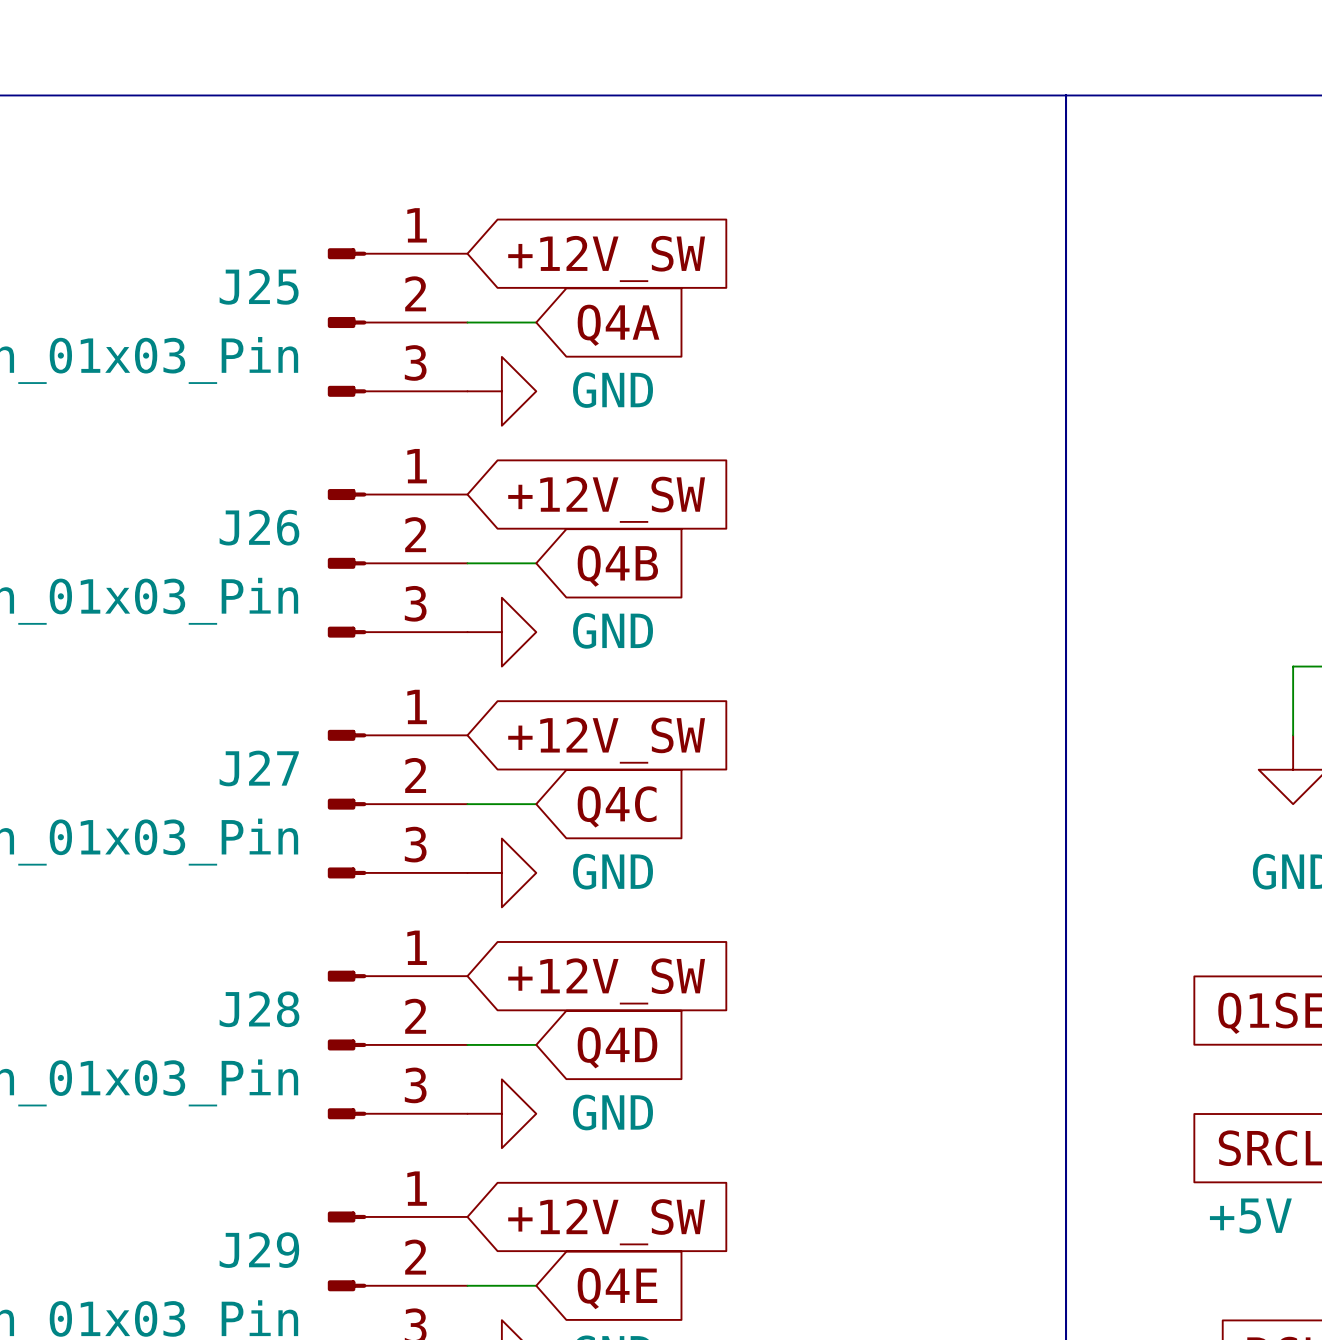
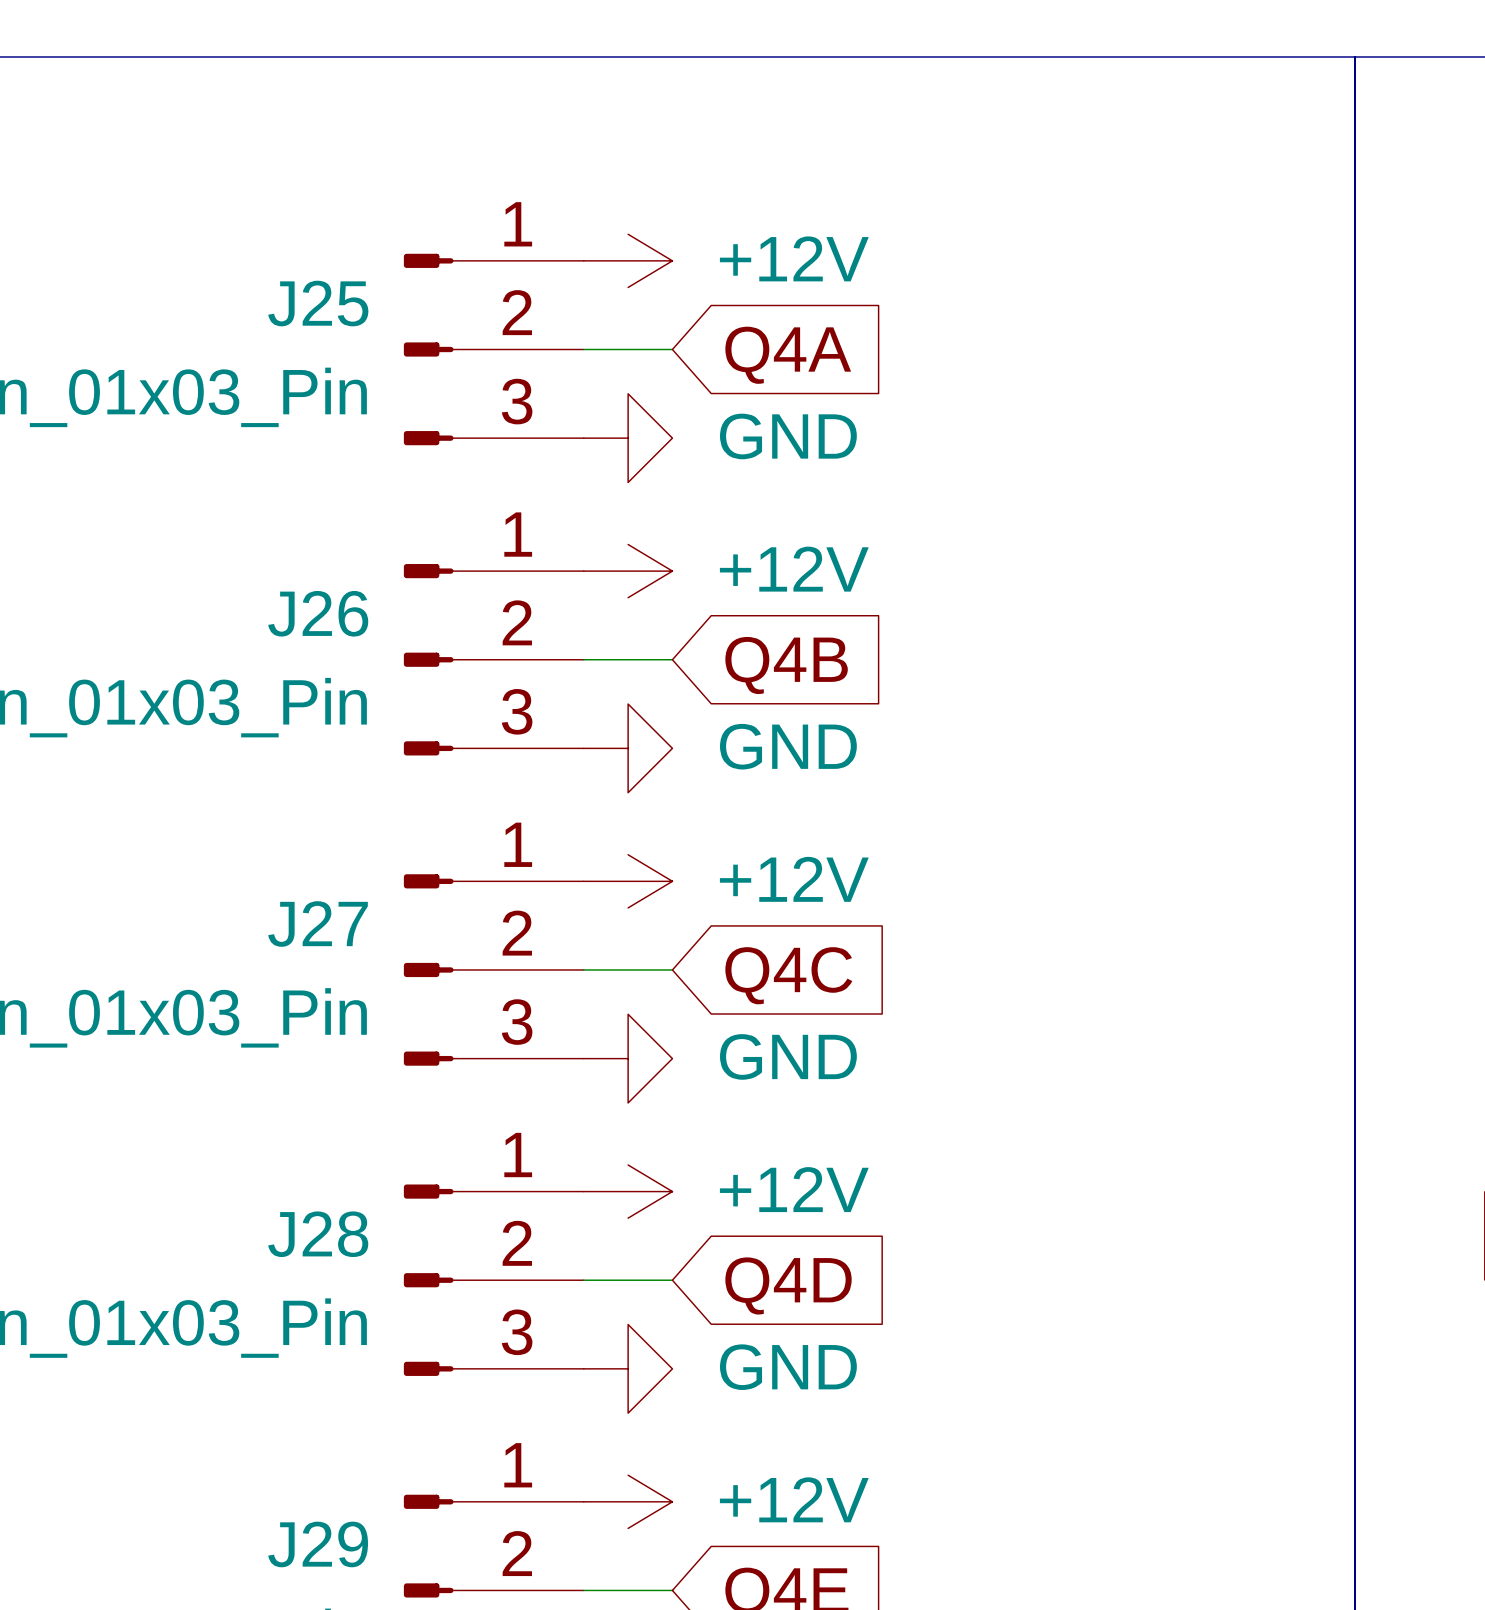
power symbol: none -> +12V (628, 260)
global label: +12V_SW (606, 258) -> none
power symbol: none -> +12V (628, 571)
global label: +12V_SW (606, 499) -> none
power symbol: none -> +12V (628, 881)
global label: +12V_SW (606, 740) -> none
power symbol: none -> +12V (628, 1191)
global label: +12V_SW (606, 981) -> none
power symbol: none -> +12V (628, 1501)
global label: +12V_SW (606, 1222) -> none

